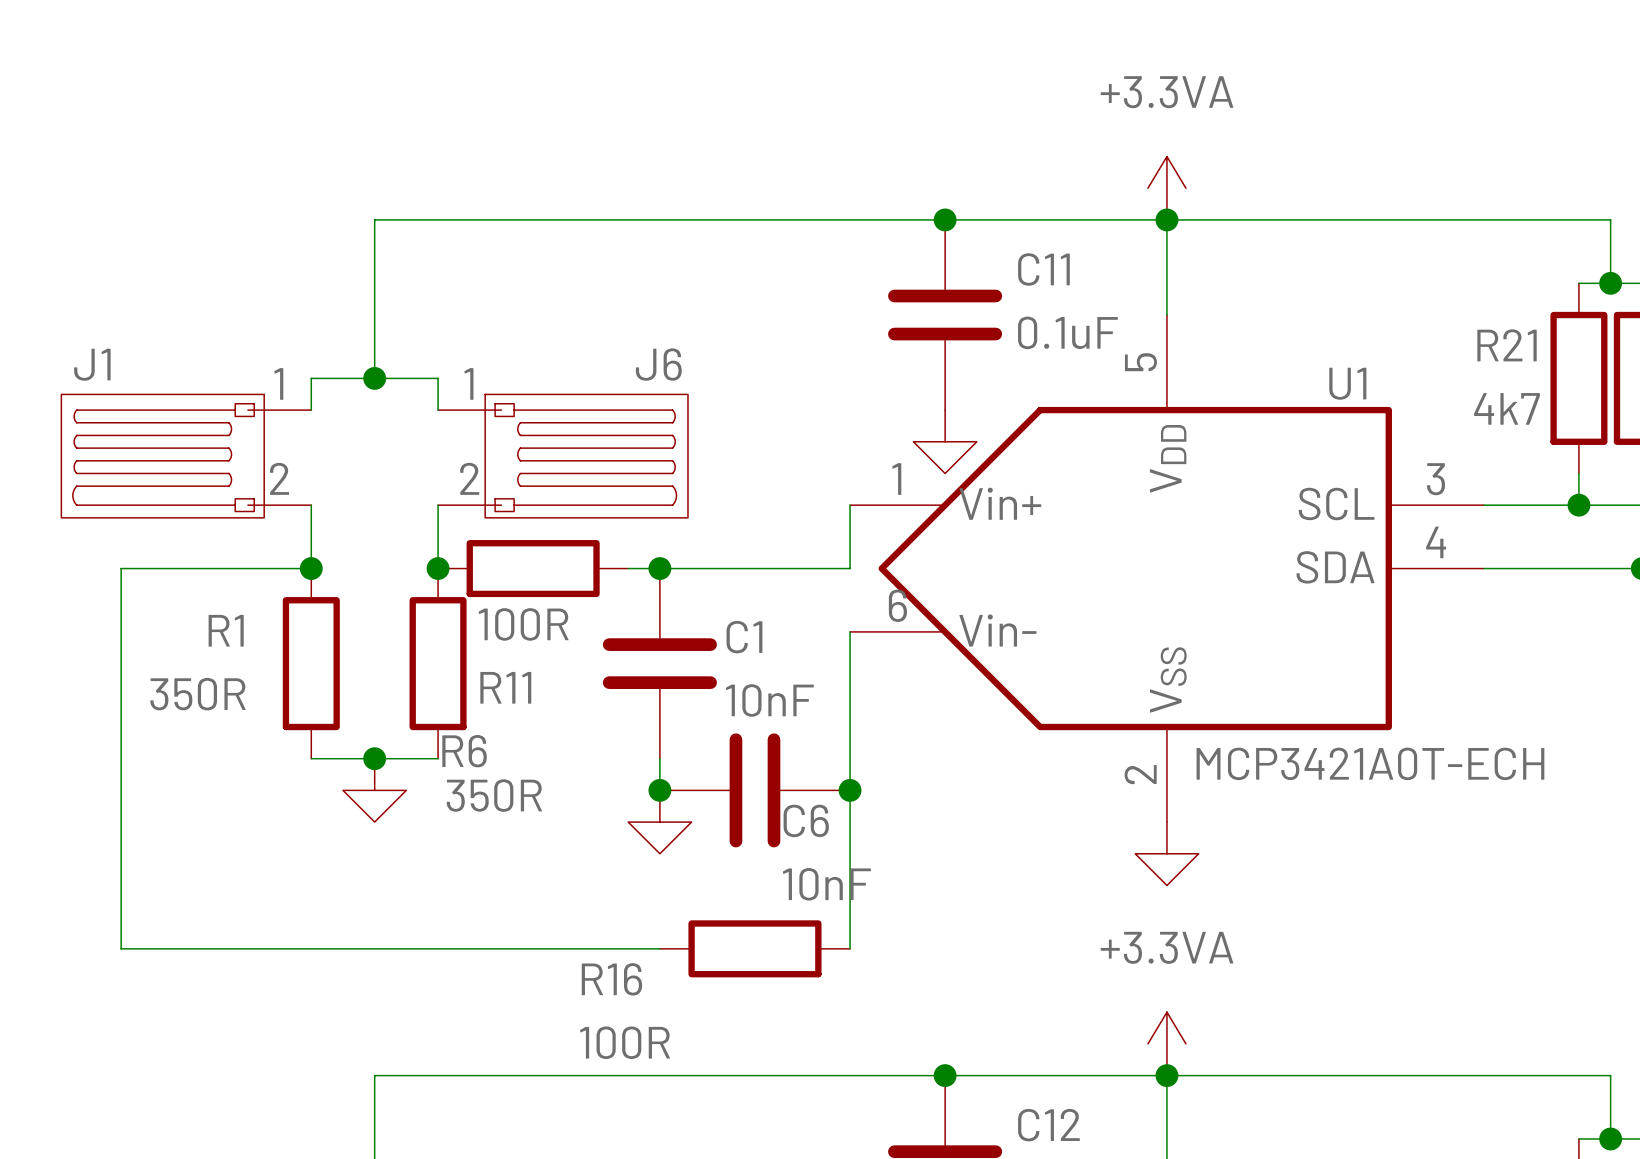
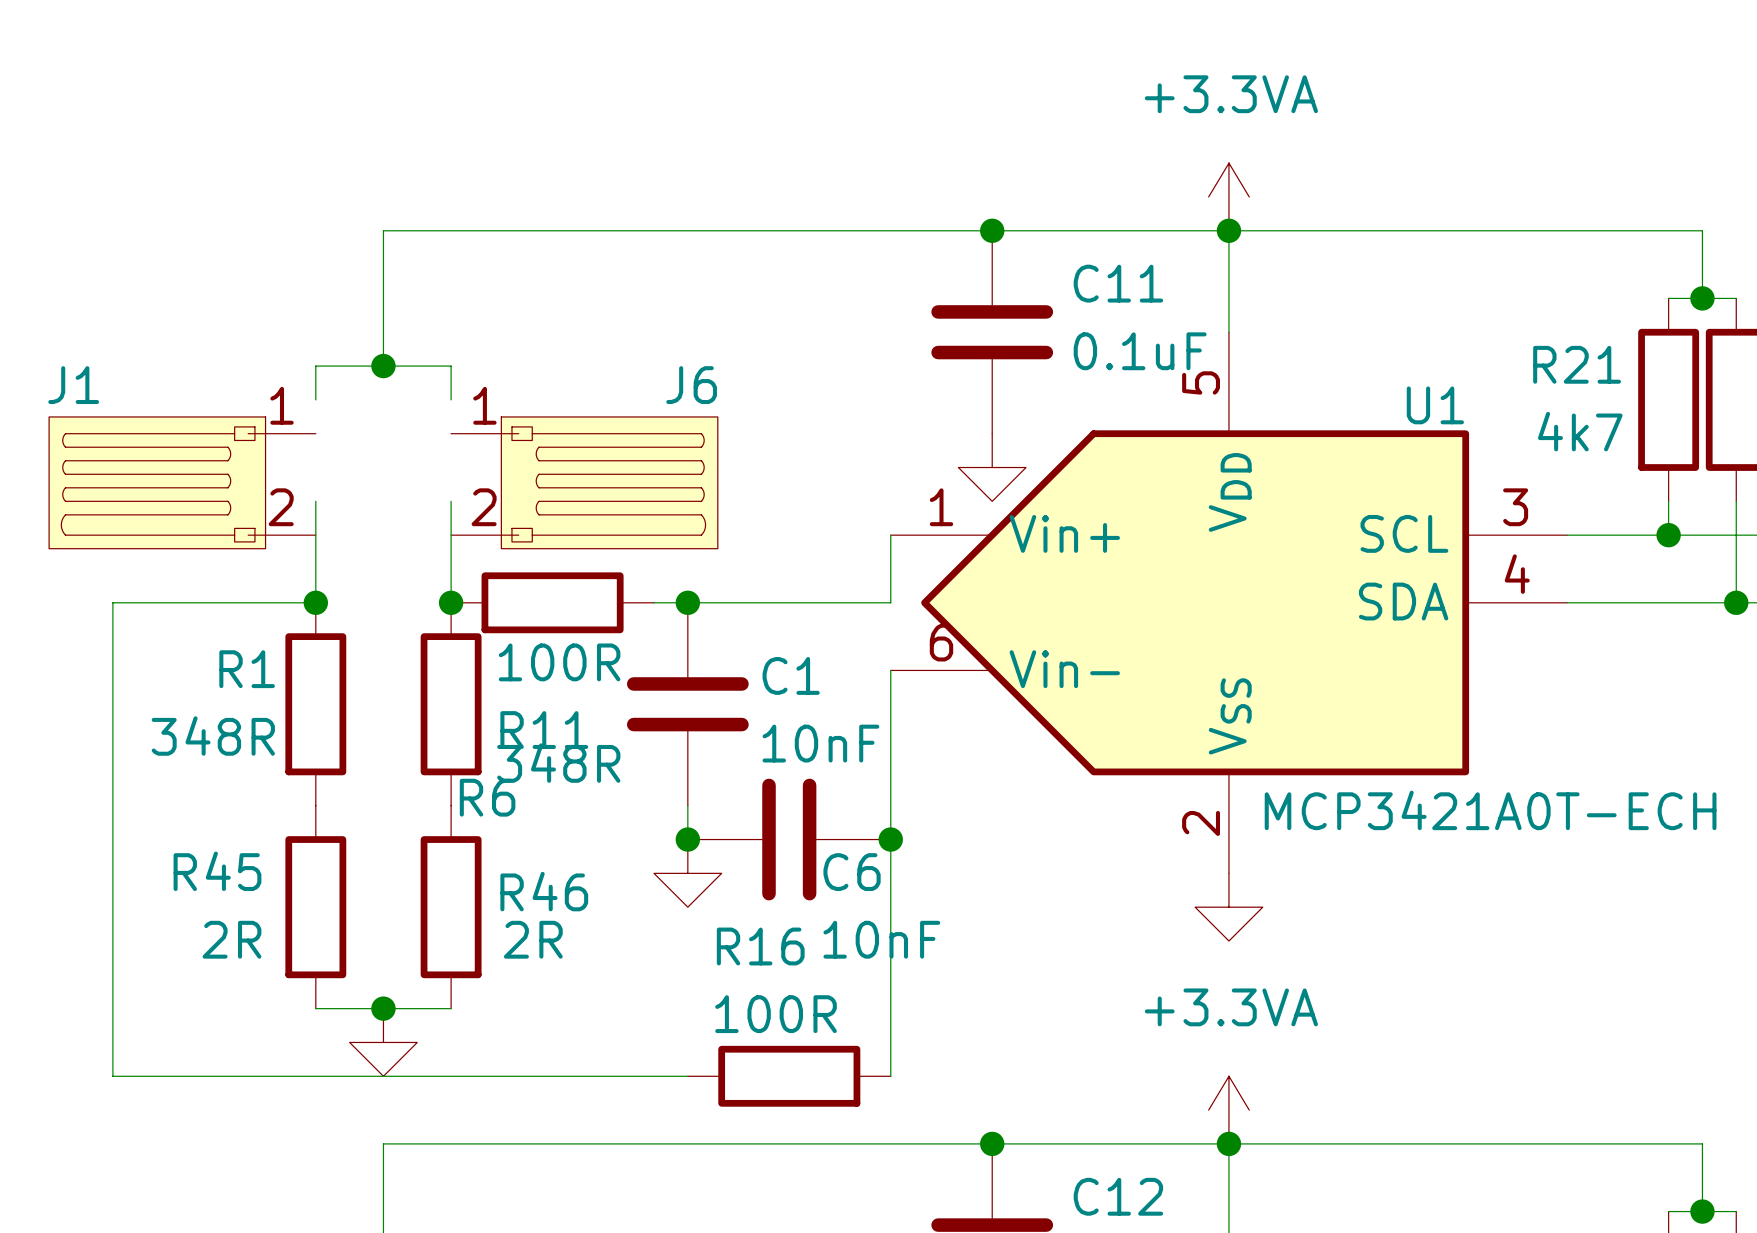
wire: (374, 346) (374, 378) -> (315, 501) (315, 535)
junction position: (374, 378) -> (383, 366)
wire: (311, 410) (311, 378) (438, 378) (438, 410) -> (315, 399) (315, 366) (451, 366) (451, 399)
wire: none -> (451, 501) (451, 535)
R1 name position: R1 (226, 630) -> R1 (247, 669)
R1 value: 350R (198, 694) -> 348R (213, 736)
wire: (311, 758) (438, 758) -> none
junction: (374, 758) -> none
power symbol position: (374, 790) -> (383, 1042)
R6 value: 350R (494, 795) -> 348R (558, 763)
R45: none -> 2R (315, 907)
R46: none -> 2R (451, 907)
wire: (121, 948) (311, 948) -> (112, 1008) (112, 1076) (687, 1076)
junction: none -> (383, 1008)
wire: (438, 948) (659, 948) -> none
R16 position: (754, 948) -> (789, 1076)
wire: none -> (890, 1008) (890, 1076)
R16 name position: R16 (611, 979) -> R16 (760, 946)
R16 value position: 100R (625, 1042) -> 100R (776, 1014)

